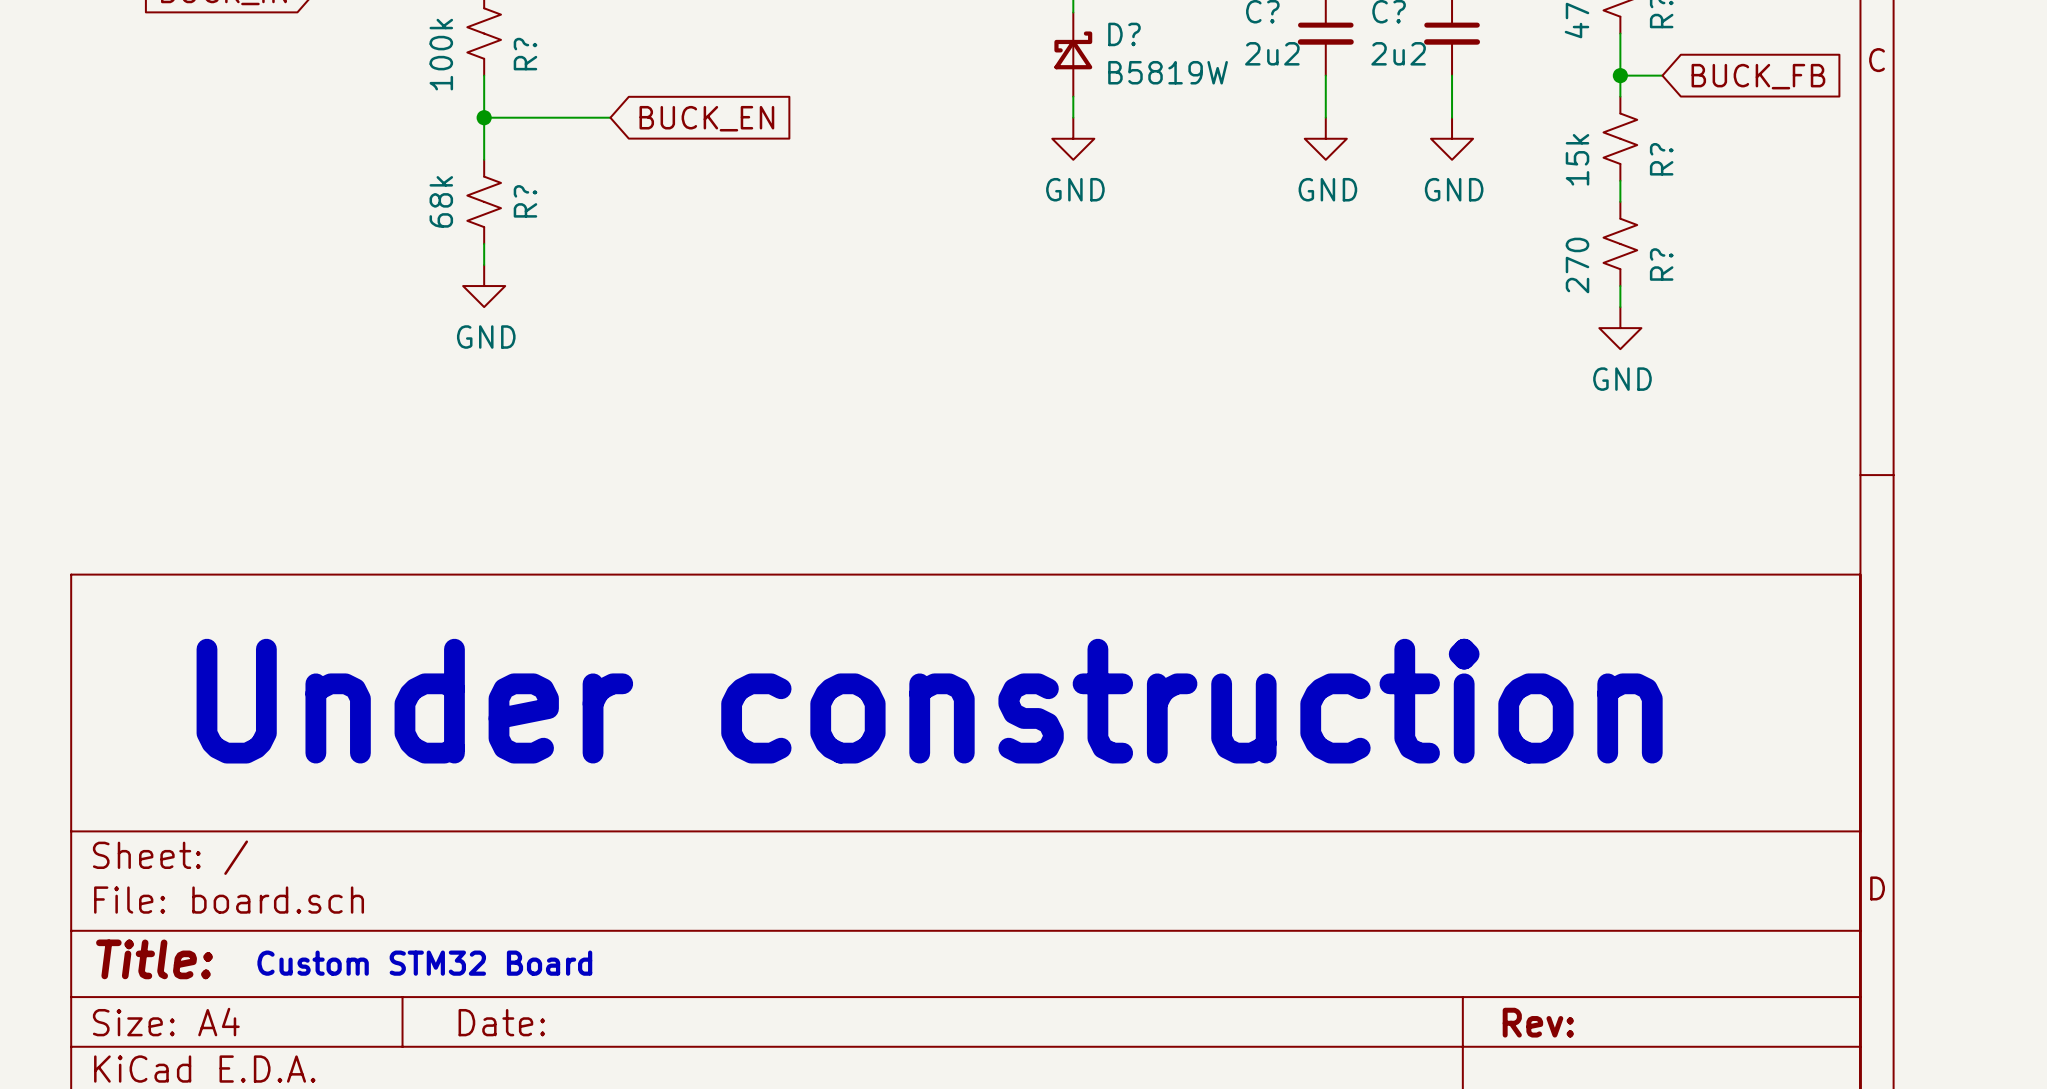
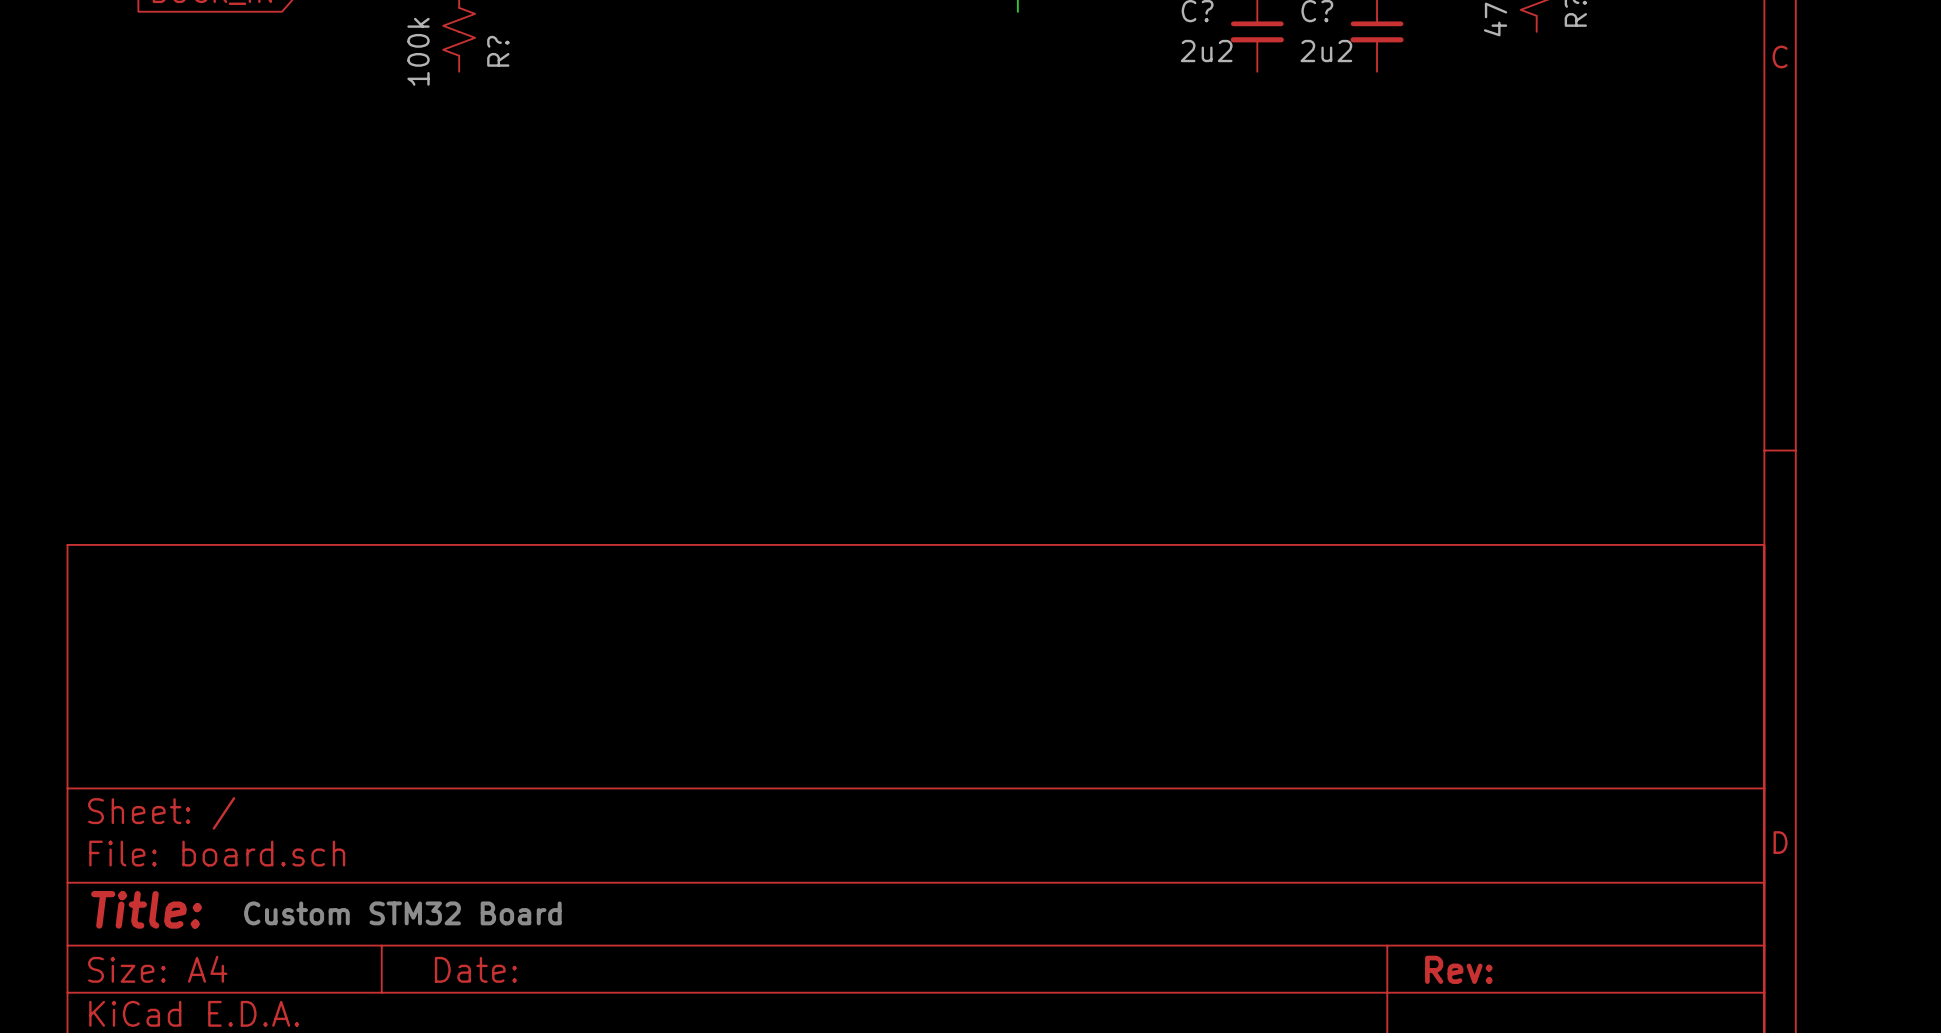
wire: (1620, 33) (1620, 96) -> none
D?: B5819W (1073, 54) -> none
wire: (484, 75) (484, 159) -> none
wire: (1325, 75) (1325, 117) -> none
wire: (1452, 75) (1452, 117) -> none
wire: (1620, 75) (1662, 75) -> none
junction: (1620, 75) -> none
global label: BUCK_FB (1758, 76) -> none
wire: (1073, 96) (1073, 117) -> none
wire: (484, 117) (610, 117) -> none
junction: (484, 117) -> none
global label: BUCK_EN (706, 118) -> none
power symbol: GND (1073, 138) -> none
power symbol: GND (1325, 138) -> none
power symbol: GND (1452, 138) -> none
R?: 15k (1620, 138) -> none
wire: (1620, 180) (1620, 201) -> none
R?: 68k (484, 201) -> none
wire: (484, 243) (484, 265) -> none
R?: 270 (1620, 243) -> none
power symbol: GND (484, 286) -> none
wire: (1620, 286) (1620, 307) -> none
power symbol: GND (1620, 328) -> none
text: Under construction (929, 701) -> none

